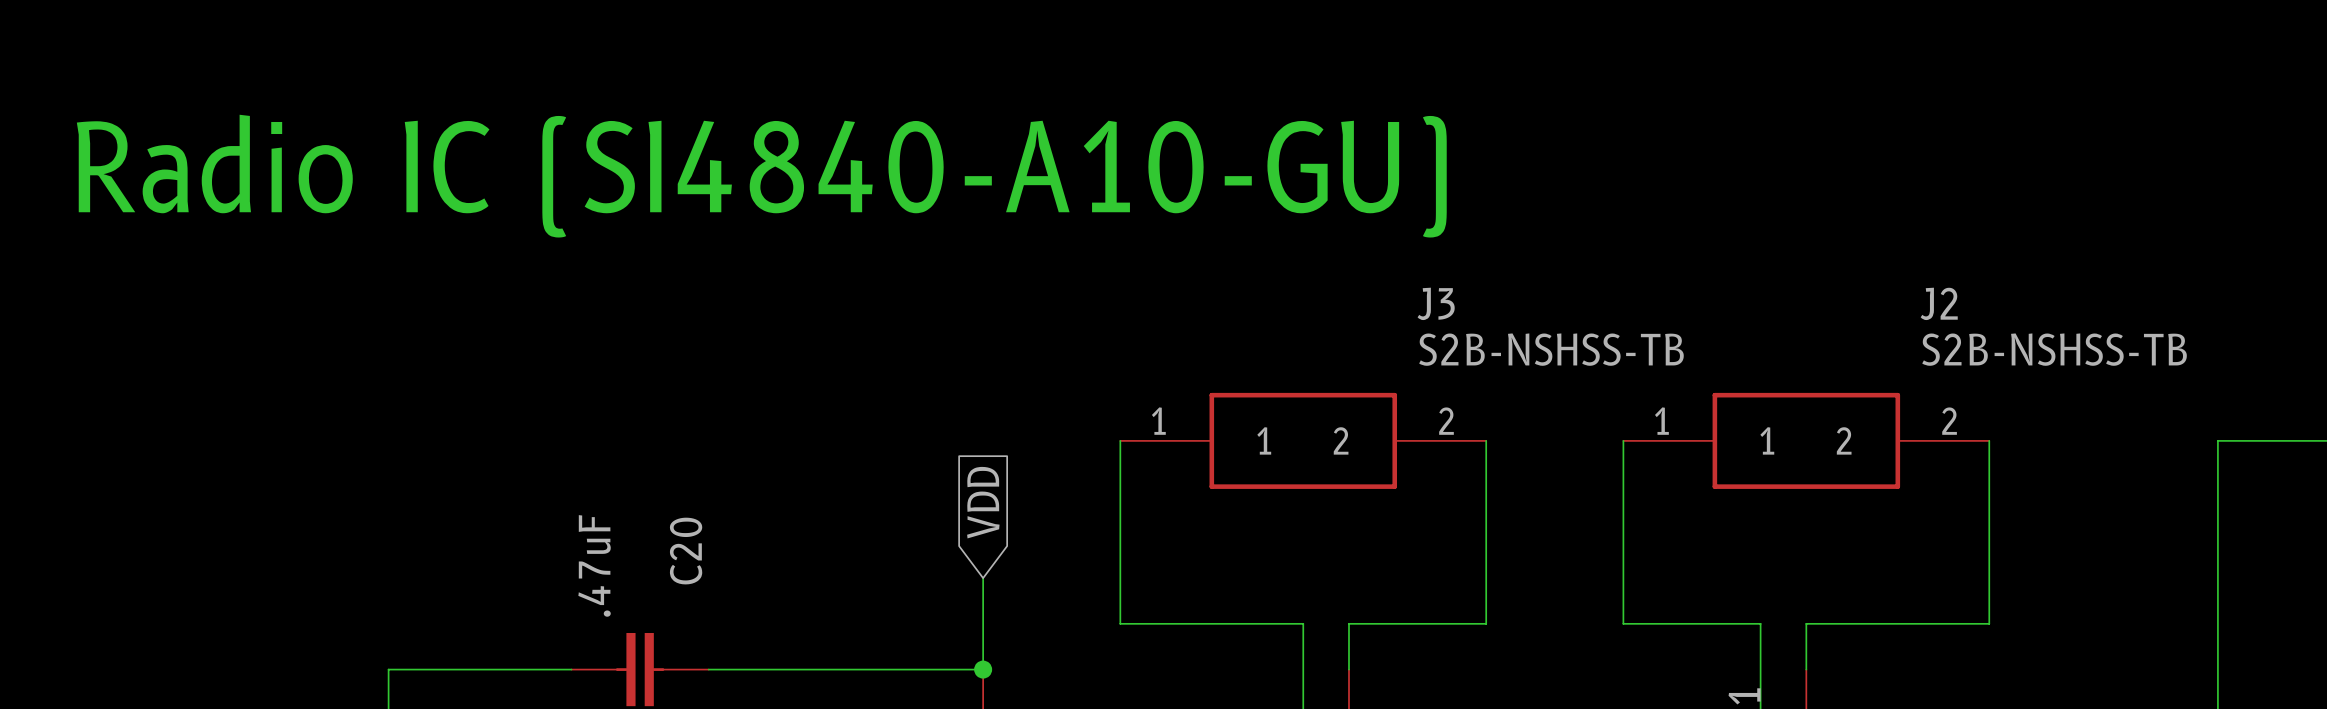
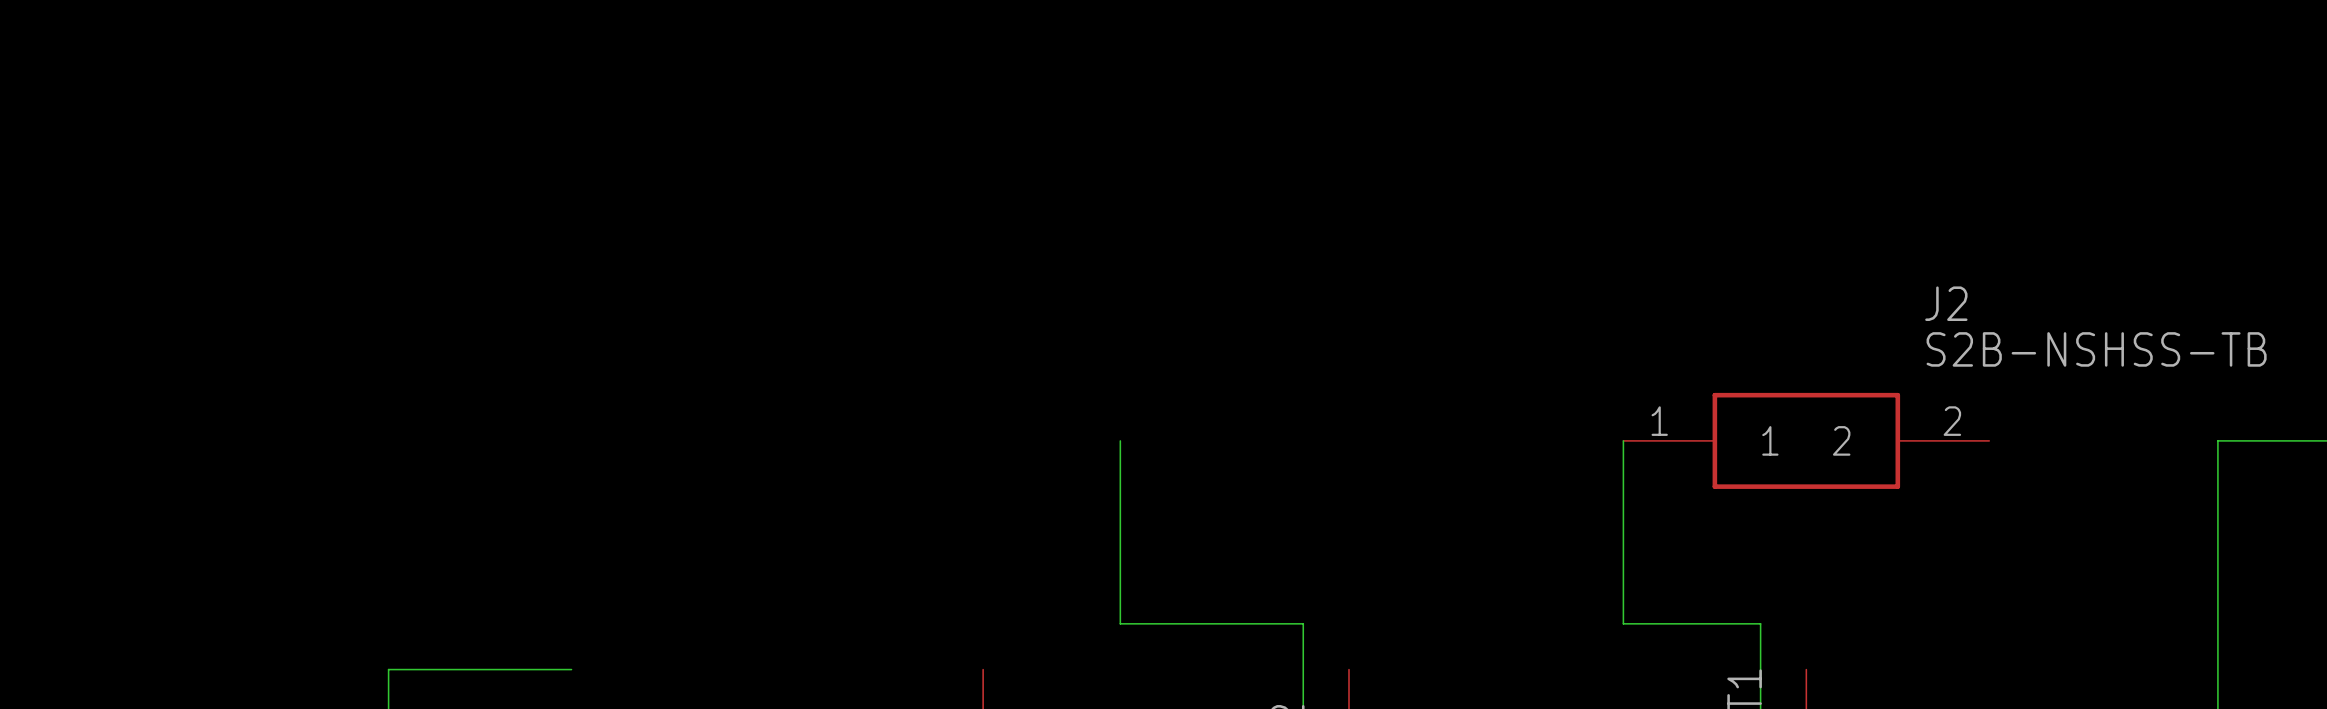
text: Radio IC (SI4840-A10-GU) (761, 176) -> none
J3: S2B-NSHSS-TB (1303, 440) -> none
wire: (1486, 440) (1486, 623) (1348, 623) (1348, 669) -> none
wire: (1989, 440) (1989, 623) (1806, 623) (1806, 669) -> none
global label: VDD (983, 502) -> none
wire: (983, 578) (983, 669) (708, 669) -> none
C20: .47uF (640, 669) -> none
junction: (983, 669) -> none

